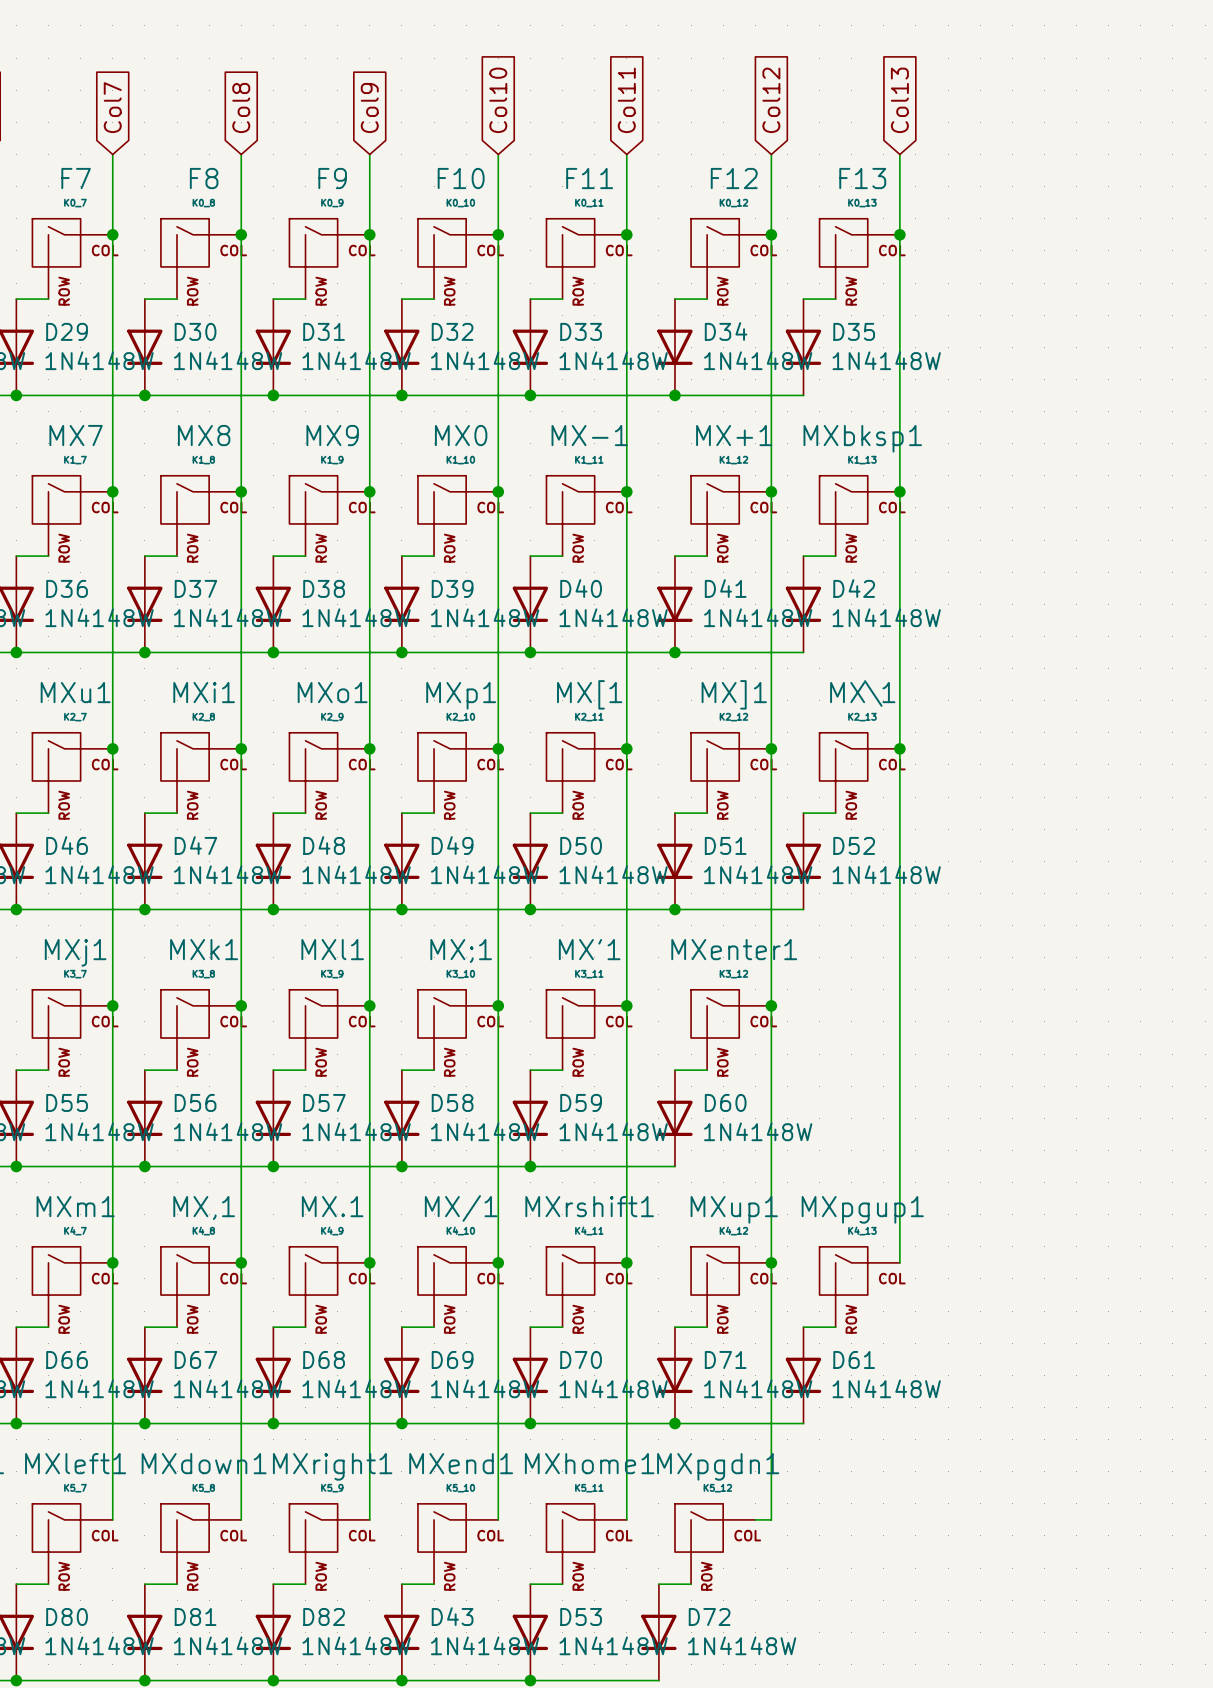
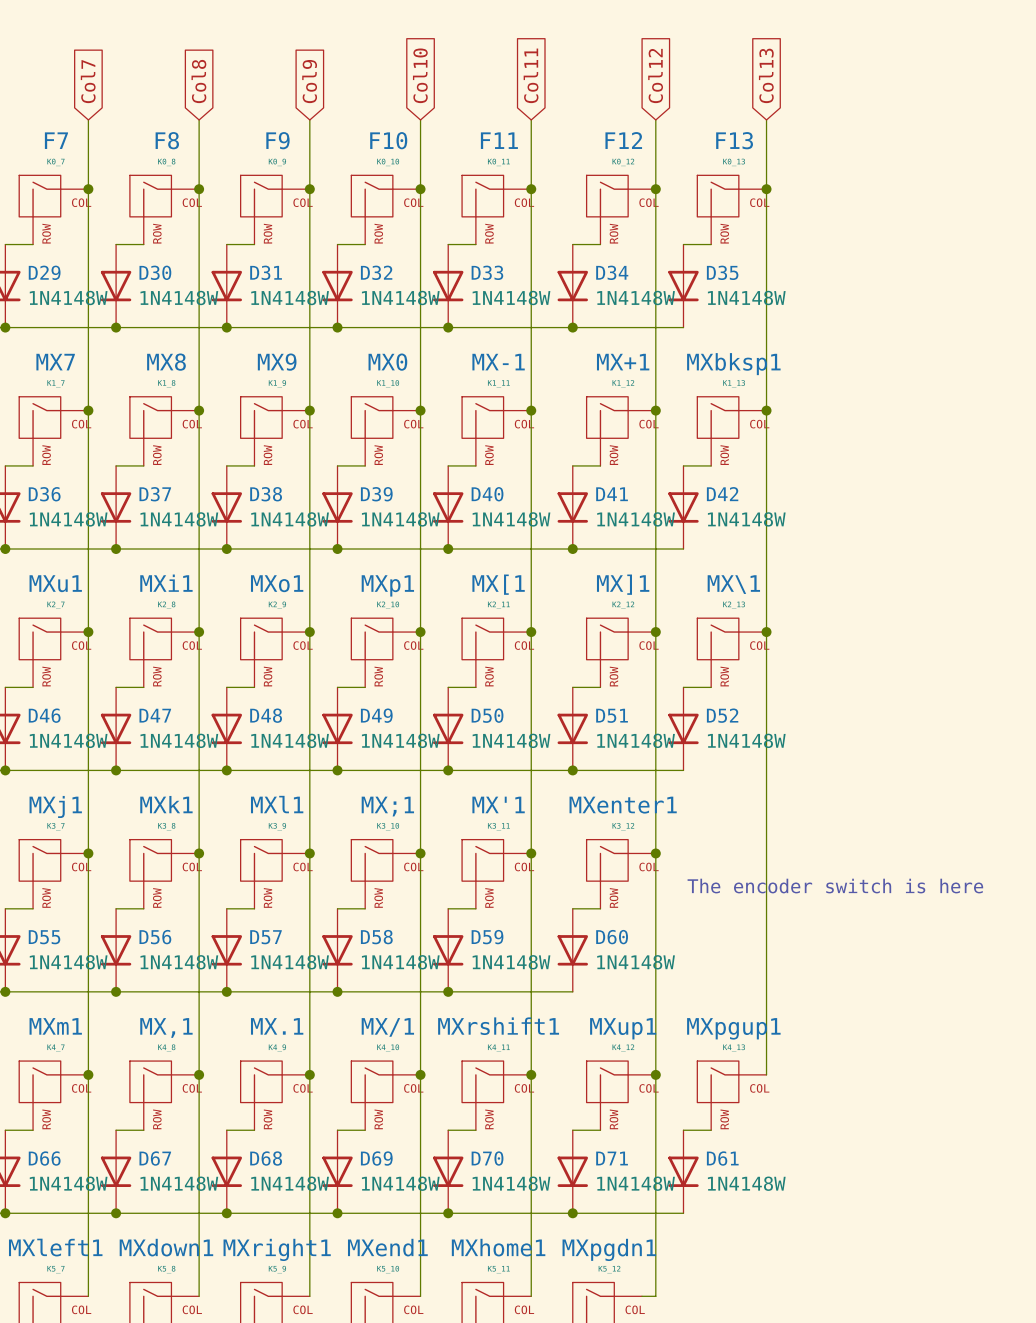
text: none -> The encoder switch is here (835, 886)

